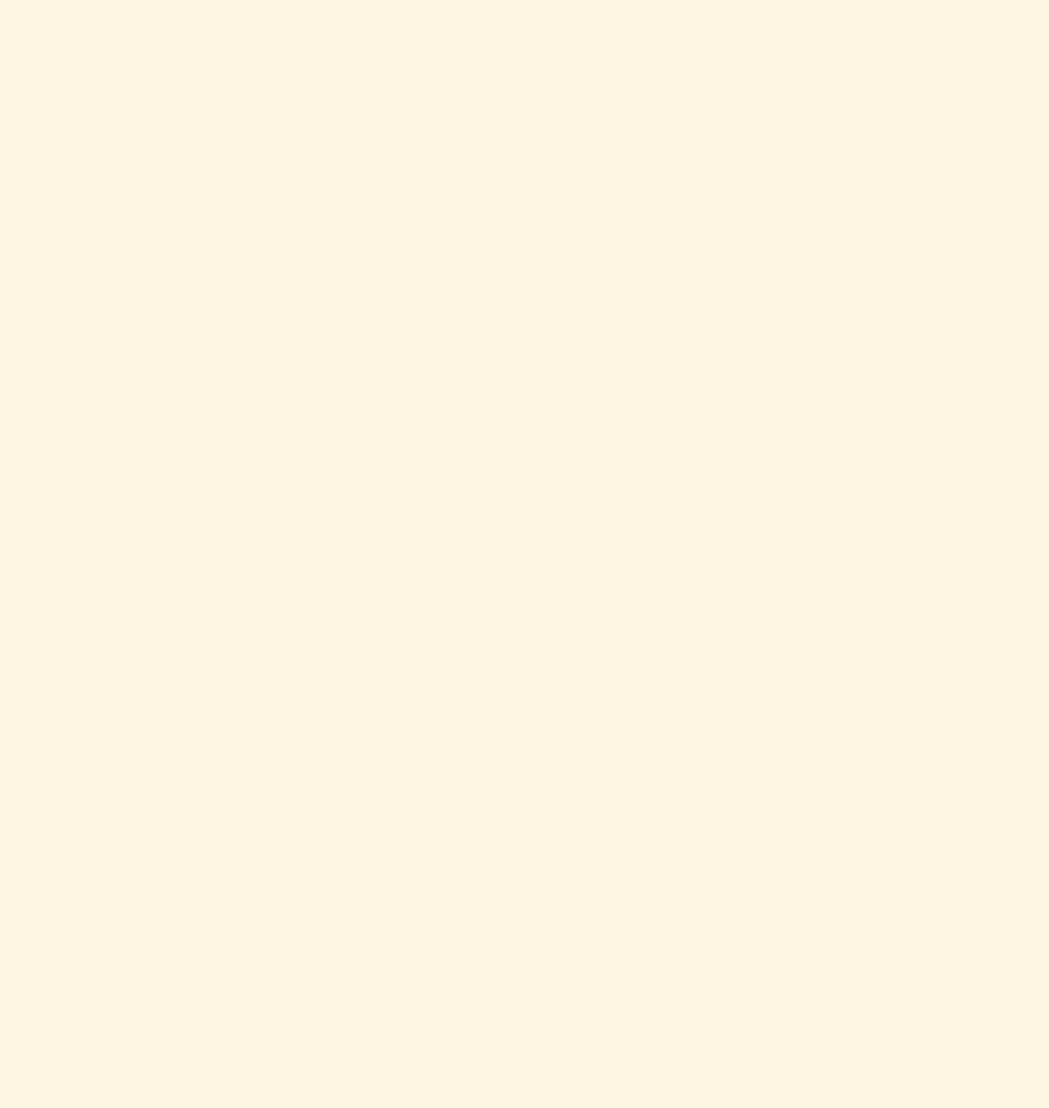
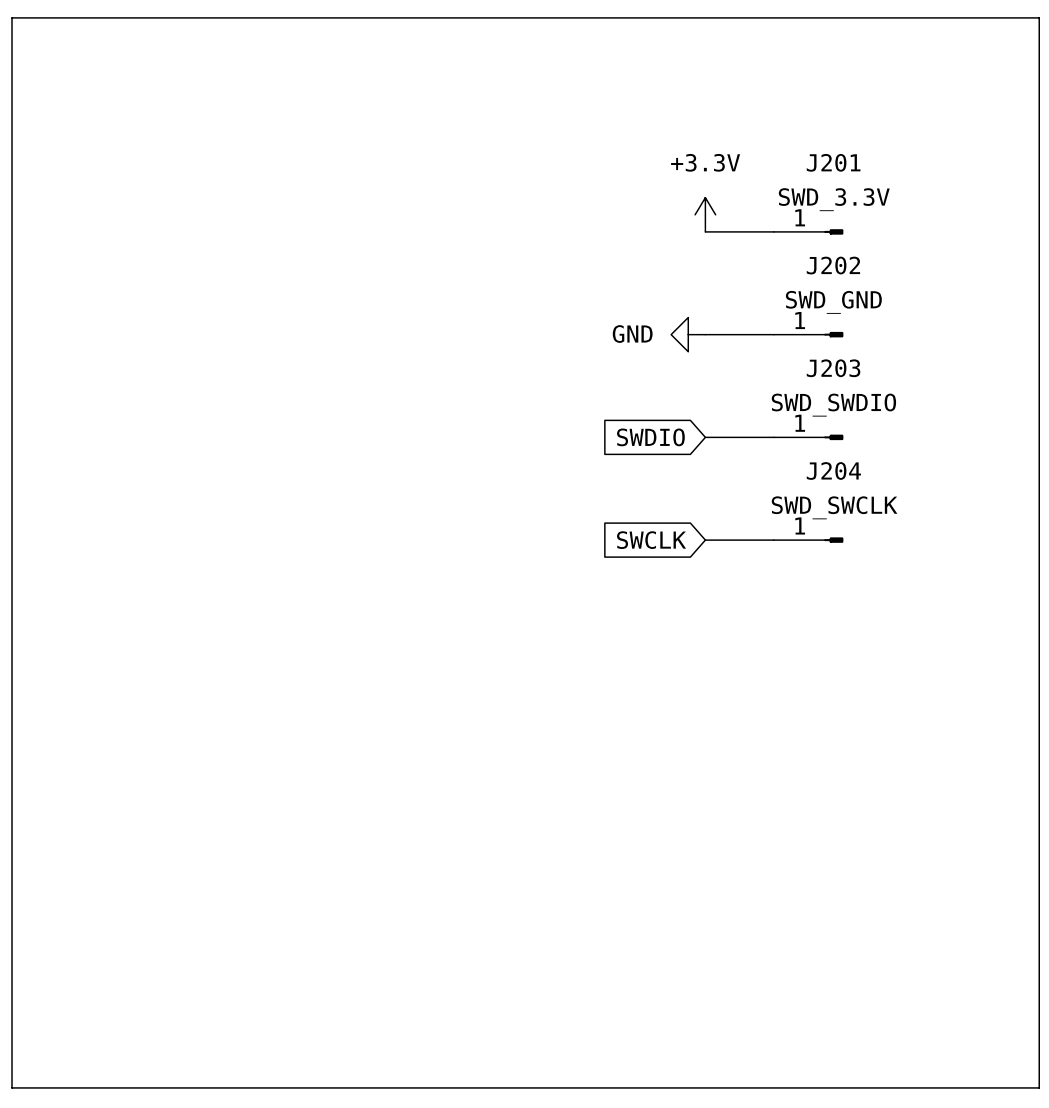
line: none -> (12, 17) (1039, 17) (1039, 1087) (12, 1087) (12, 17)
power symbol: none -> +3.3V (705, 214)
wire: none -> (705, 231) (773, 231)
J201: none -> SWD_3.3V (808, 231)
power symbol: none -> GND (688, 334)
wire: none -> (705, 334) (773, 334)
J202: none -> SWD_GND (808, 334)
global label: none -> SWDIO (650, 437)
wire: none -> (705, 437) (773, 437)
J203: none -> SWD_SWDIO (808, 437)
global label: none -> SWCLK (651, 540)
wire: none -> (705, 540) (773, 540)
J204: none -> SWD_SWCLK (808, 540)

